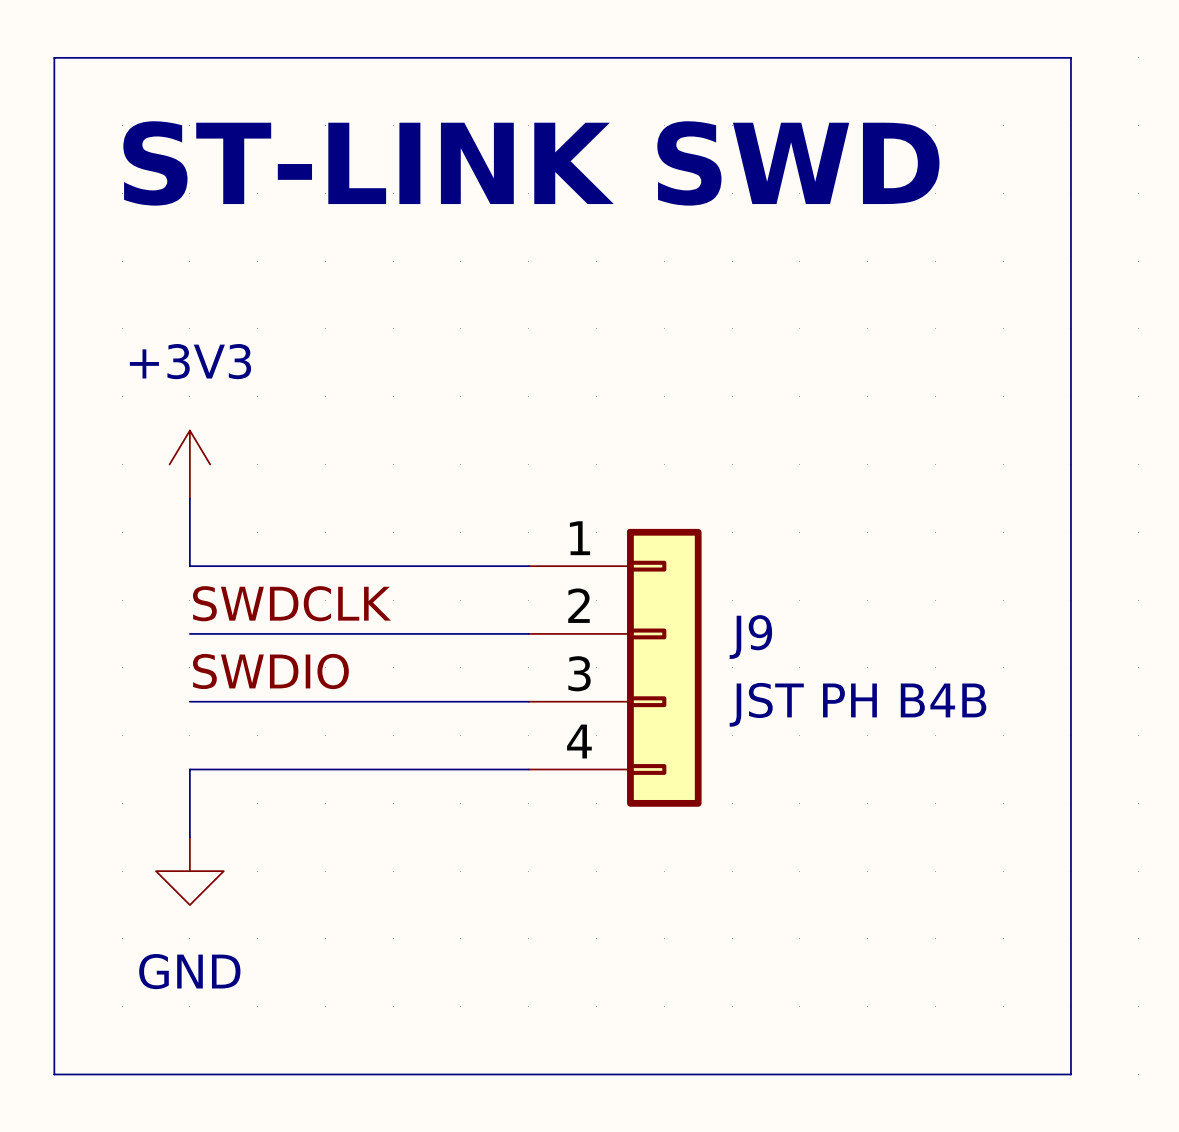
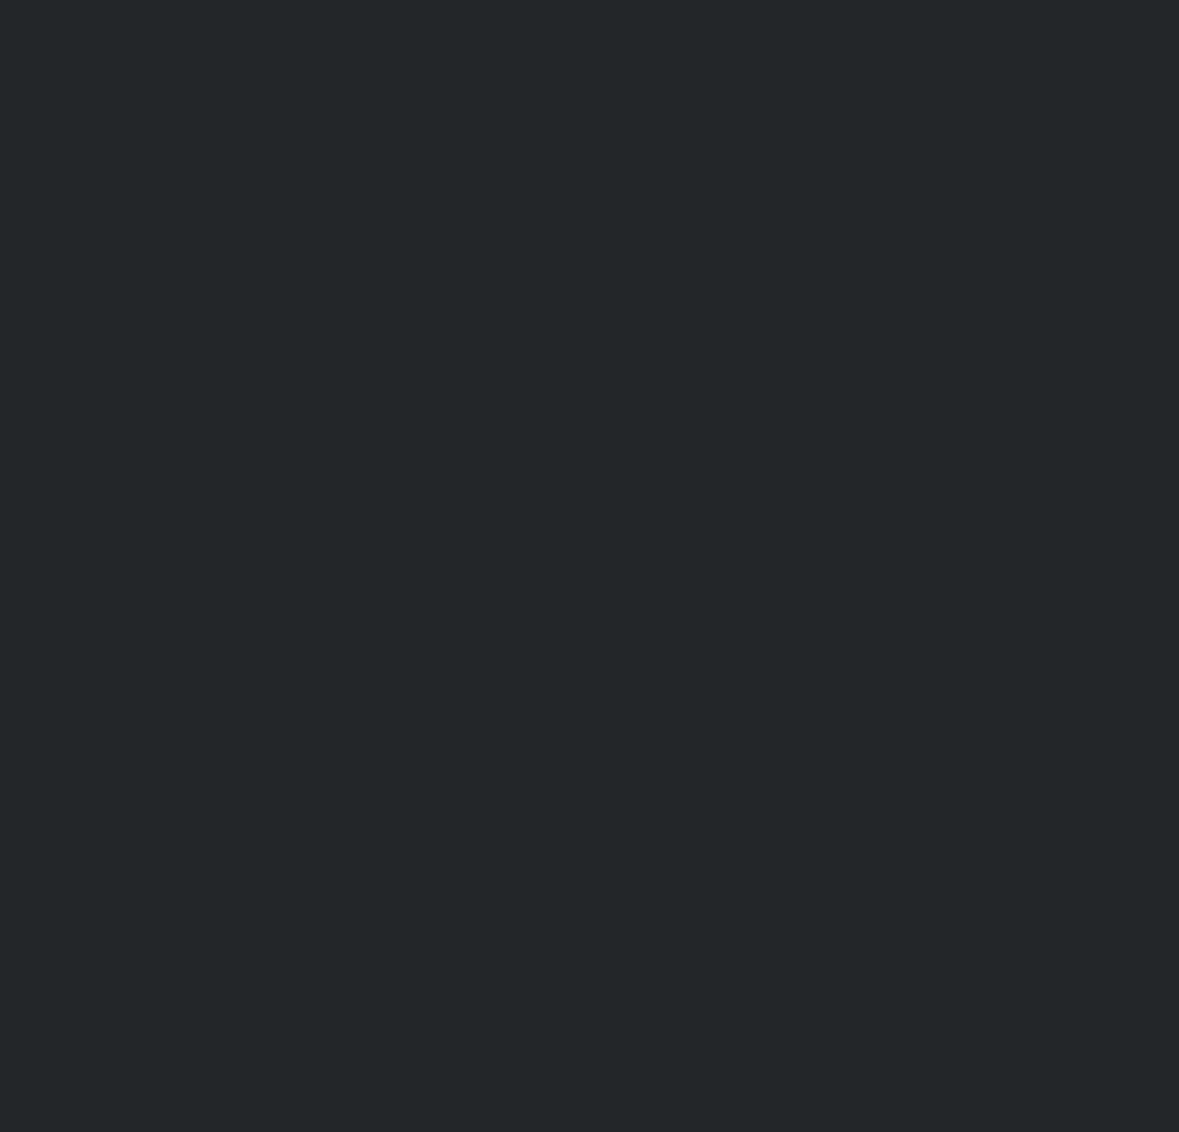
line: (54, 57) (1070, 57) (1070, 1074) (54, 1074) (54, 57) -> none
text: ST-LINK SWD (531, 163) -> none
power symbol: +3V3 (189, 464) -> none
wire: (189, 498) (189, 566) (528, 566) -> none
label: SWDCLK (291, 603) -> none
wire: (189, 633) (528, 633) -> none
J9: JST PH B4B (615, 667) -> none
label: SWDIO (270, 671) -> none
wire: (189, 701) (528, 701) -> none
wire: (528, 769) (189, 769) (189, 837) -> none
power symbol: GND (189, 871) -> none

